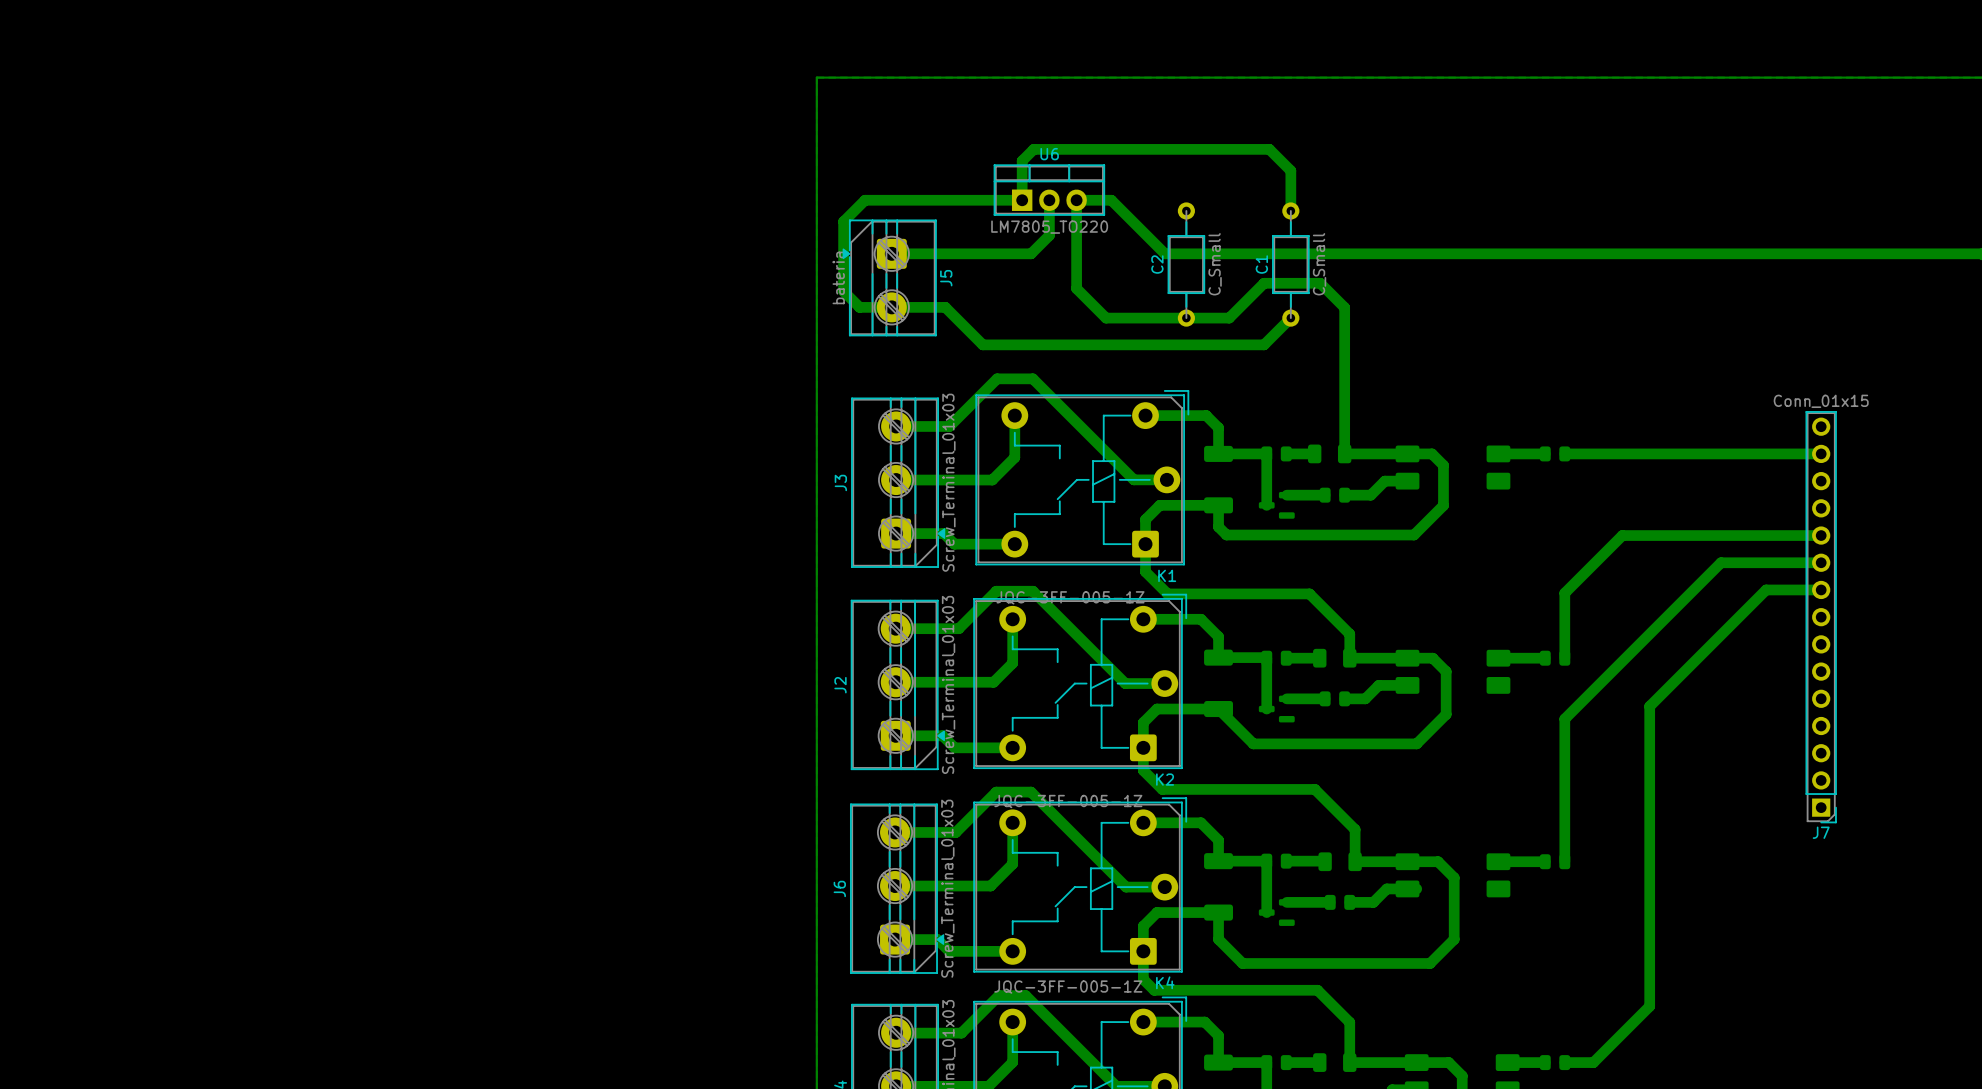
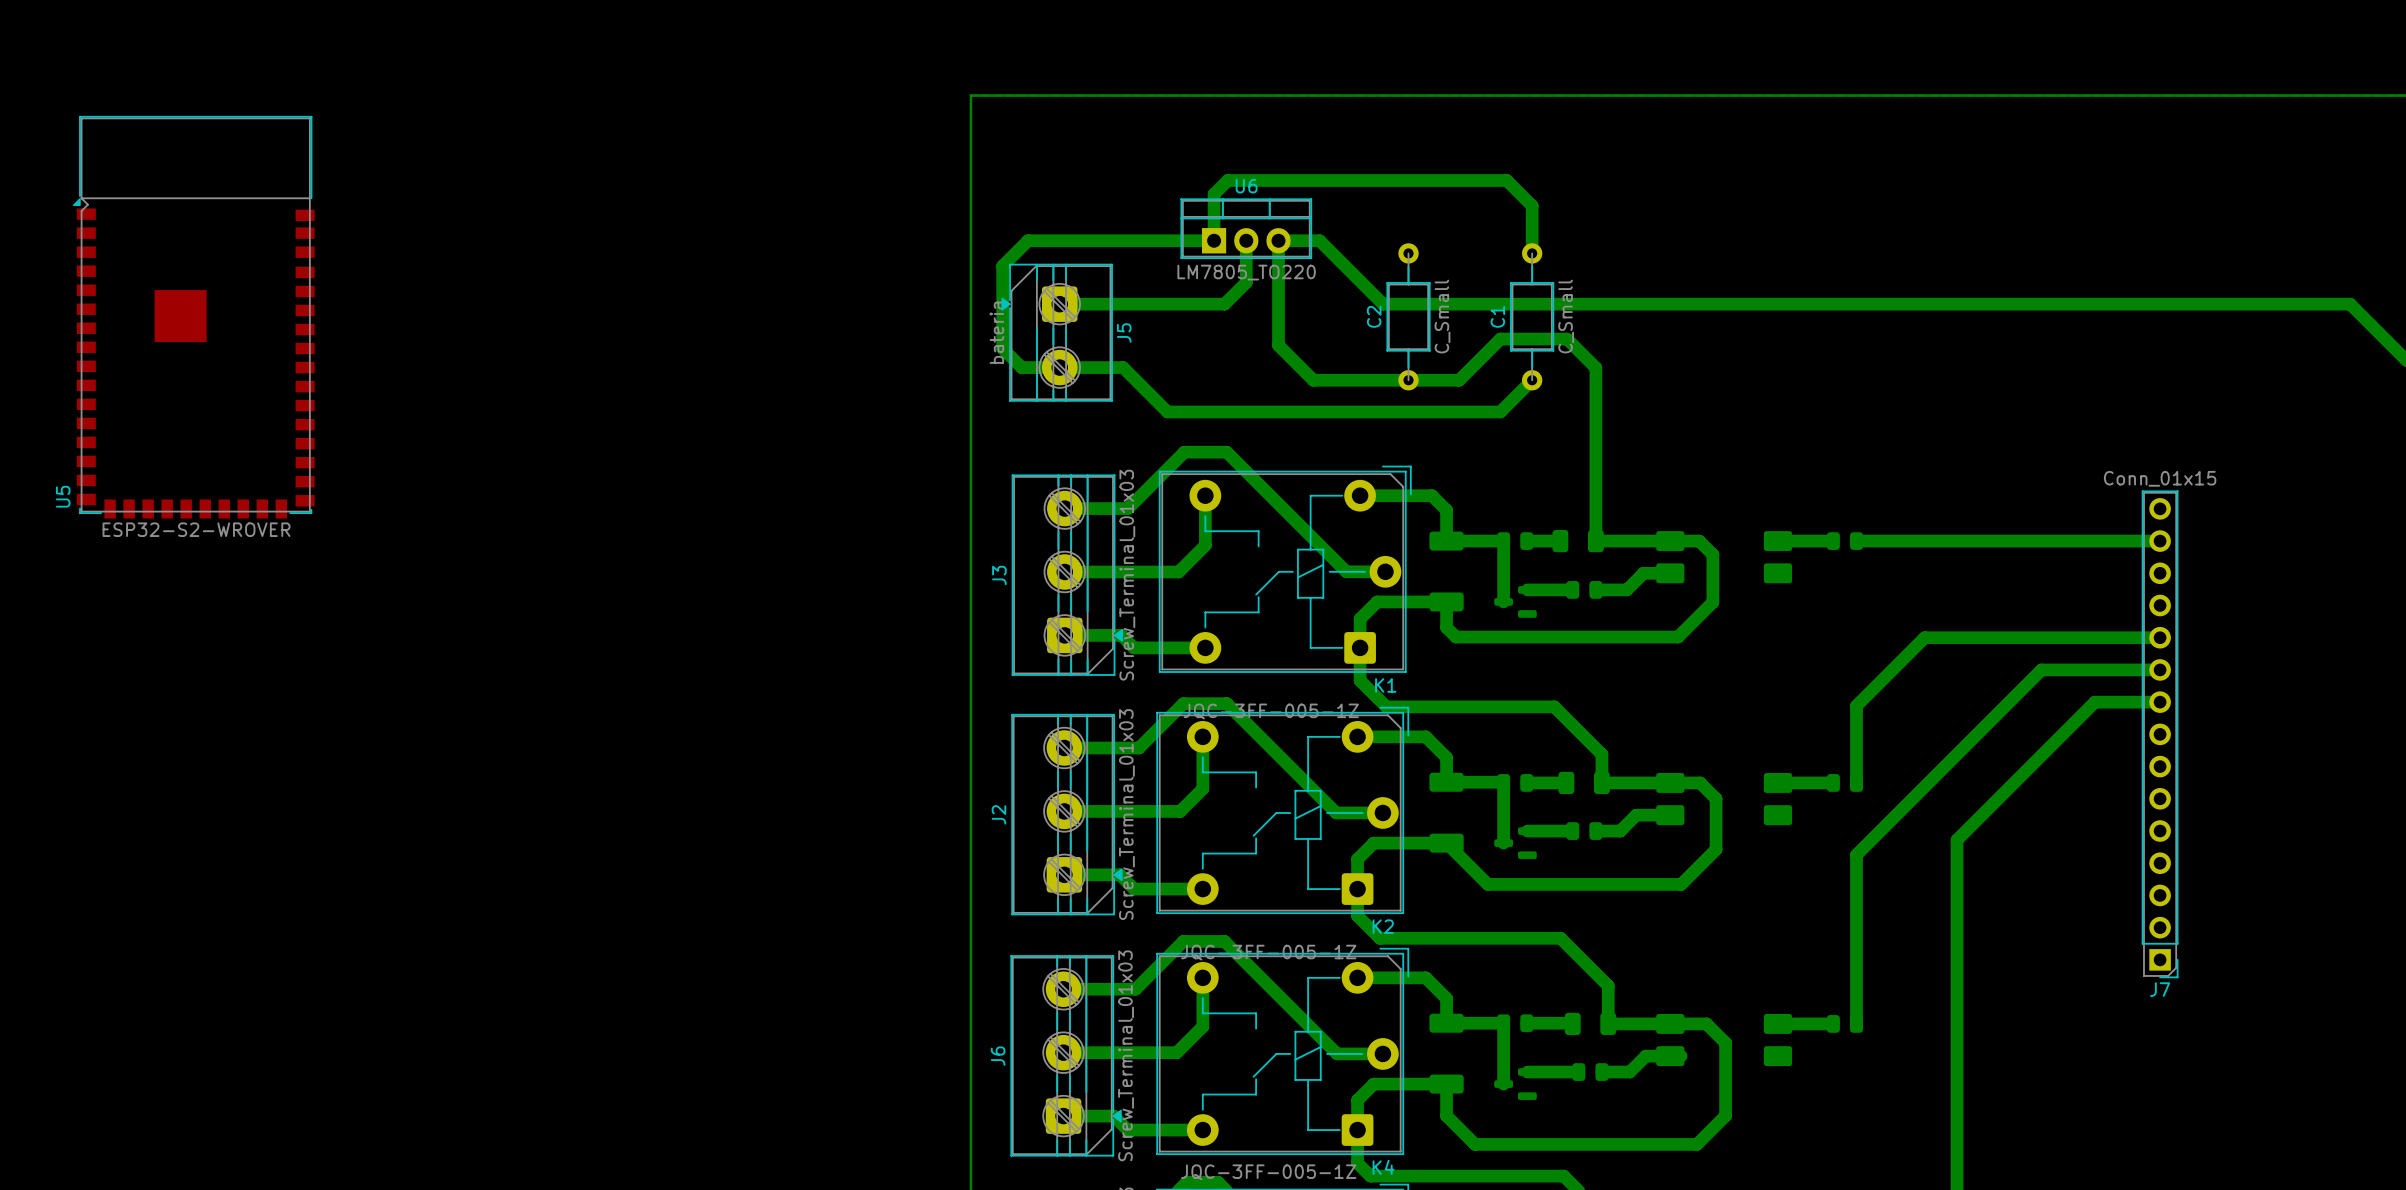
U5: none -> ESP32-S2-WROVER (193, 317)

